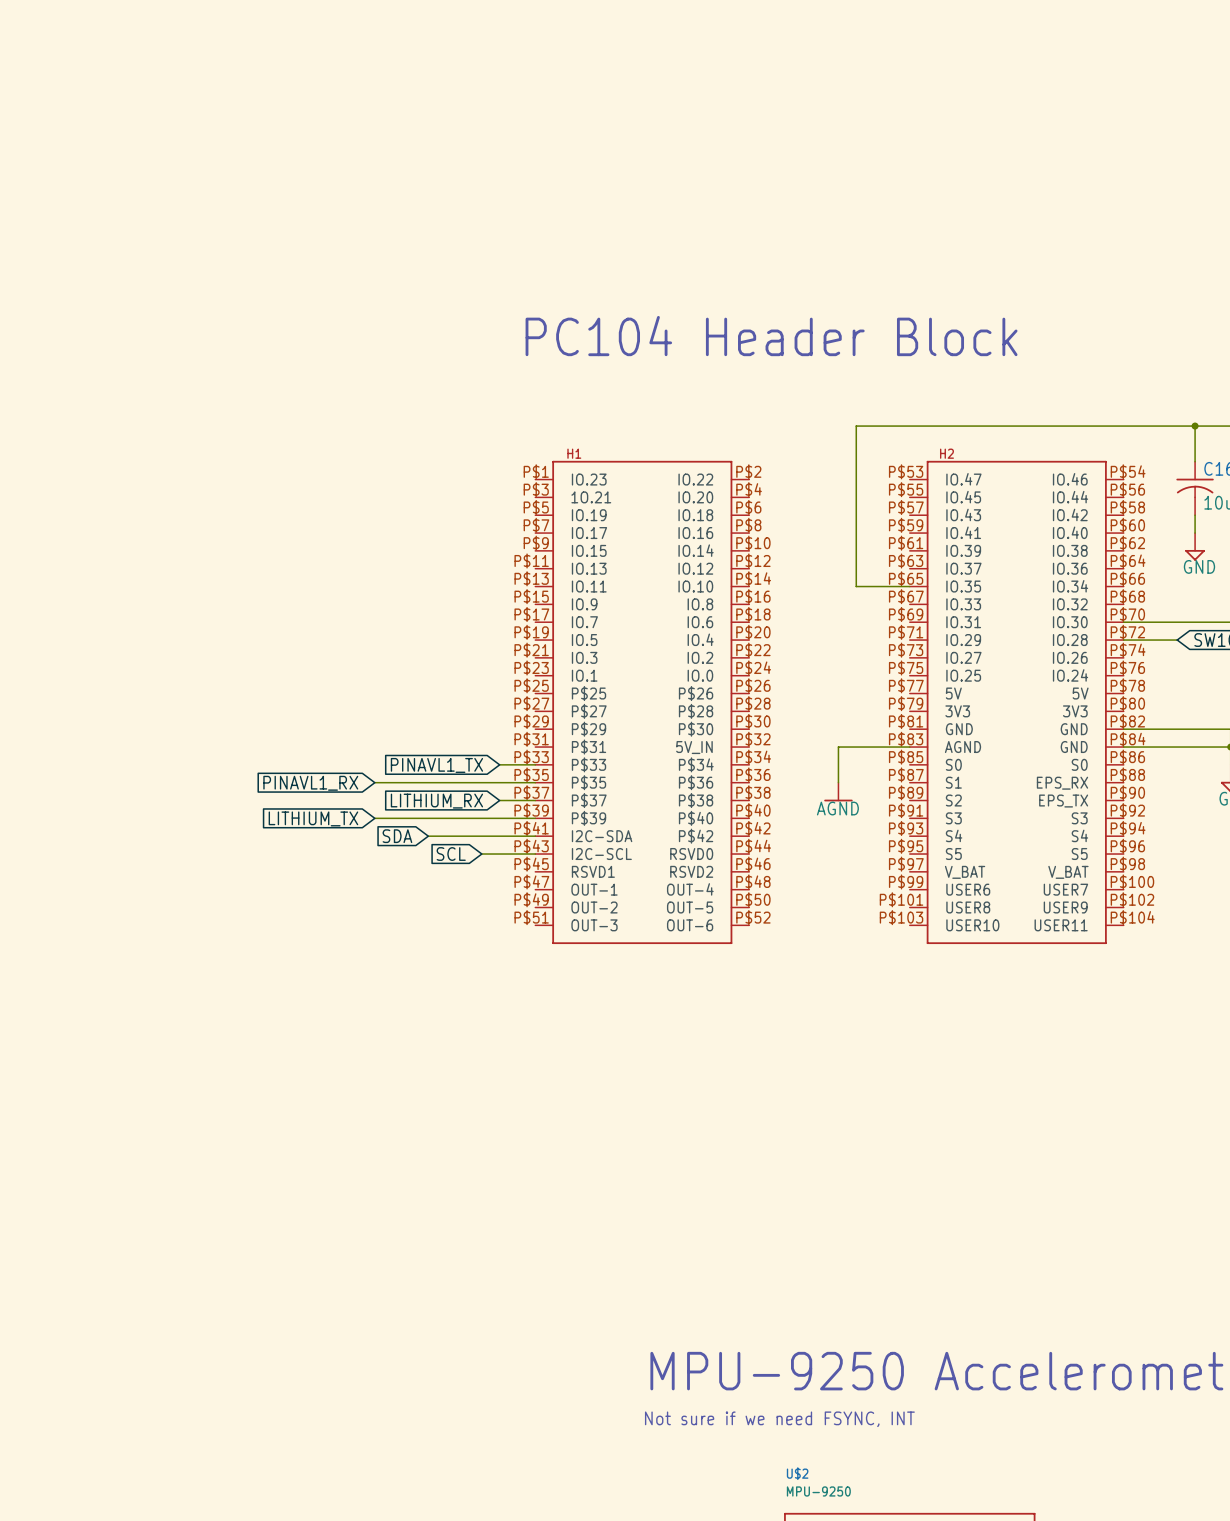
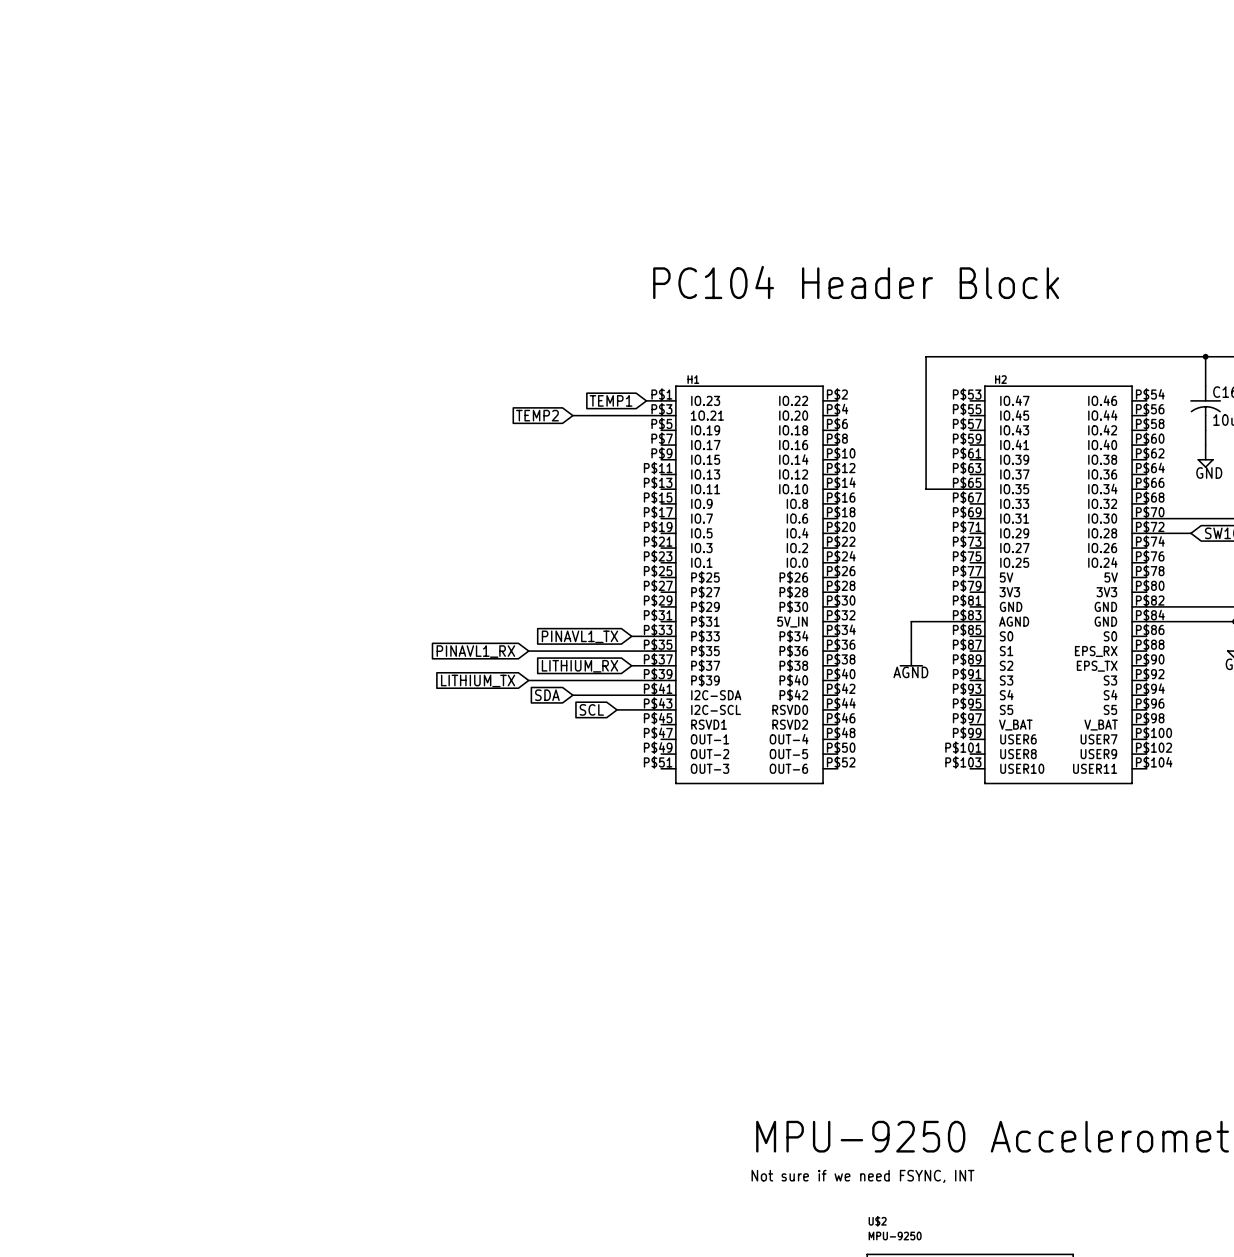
global label: none -> TEMP1 (611, 400)
wire: none -> (646, 400) (661, 400)
global label: none -> TEMP2 (537, 415)
wire: none -> (572, 415) (661, 415)

